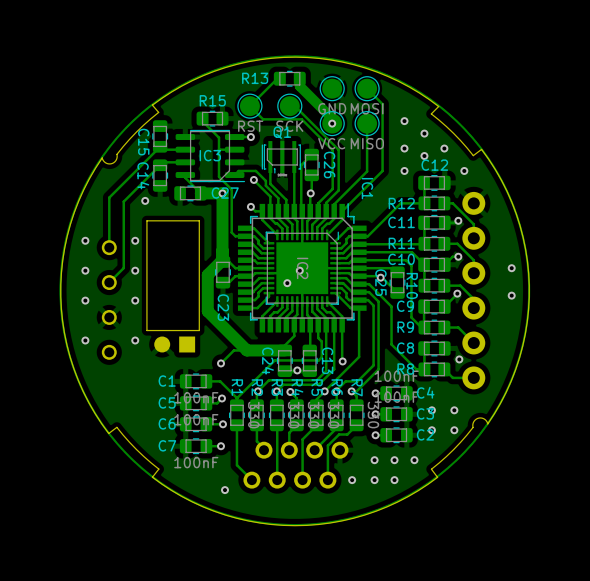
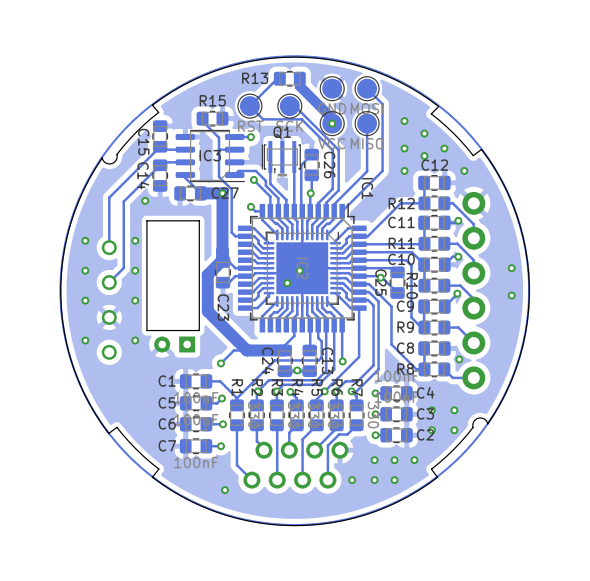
part footprint: [154, 336, 196, 353] -> [154, 336, 196, 353]

